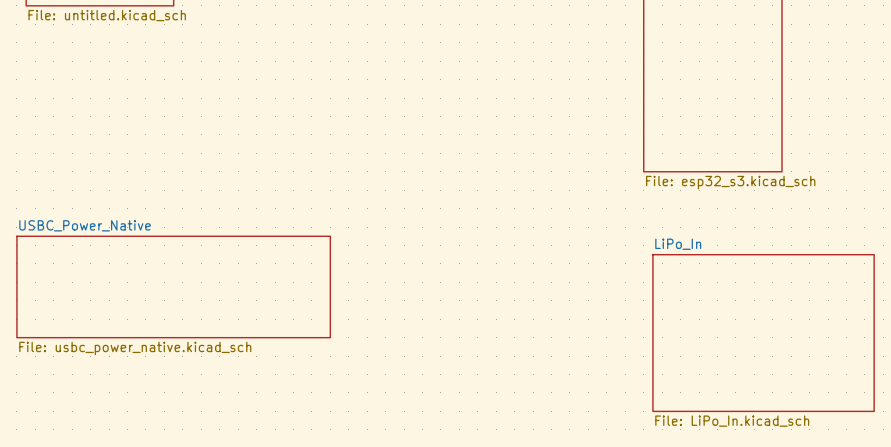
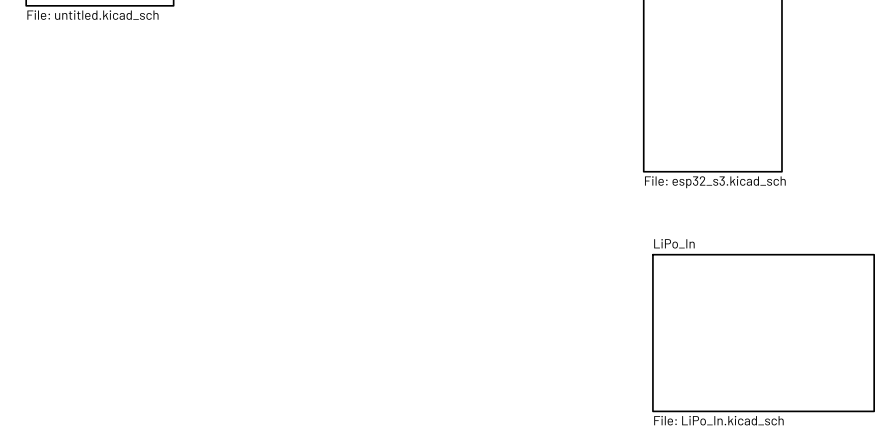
sheet USBC_Power_Native: File: usbc_power_native.kicad_sch (173, 286) -> none

